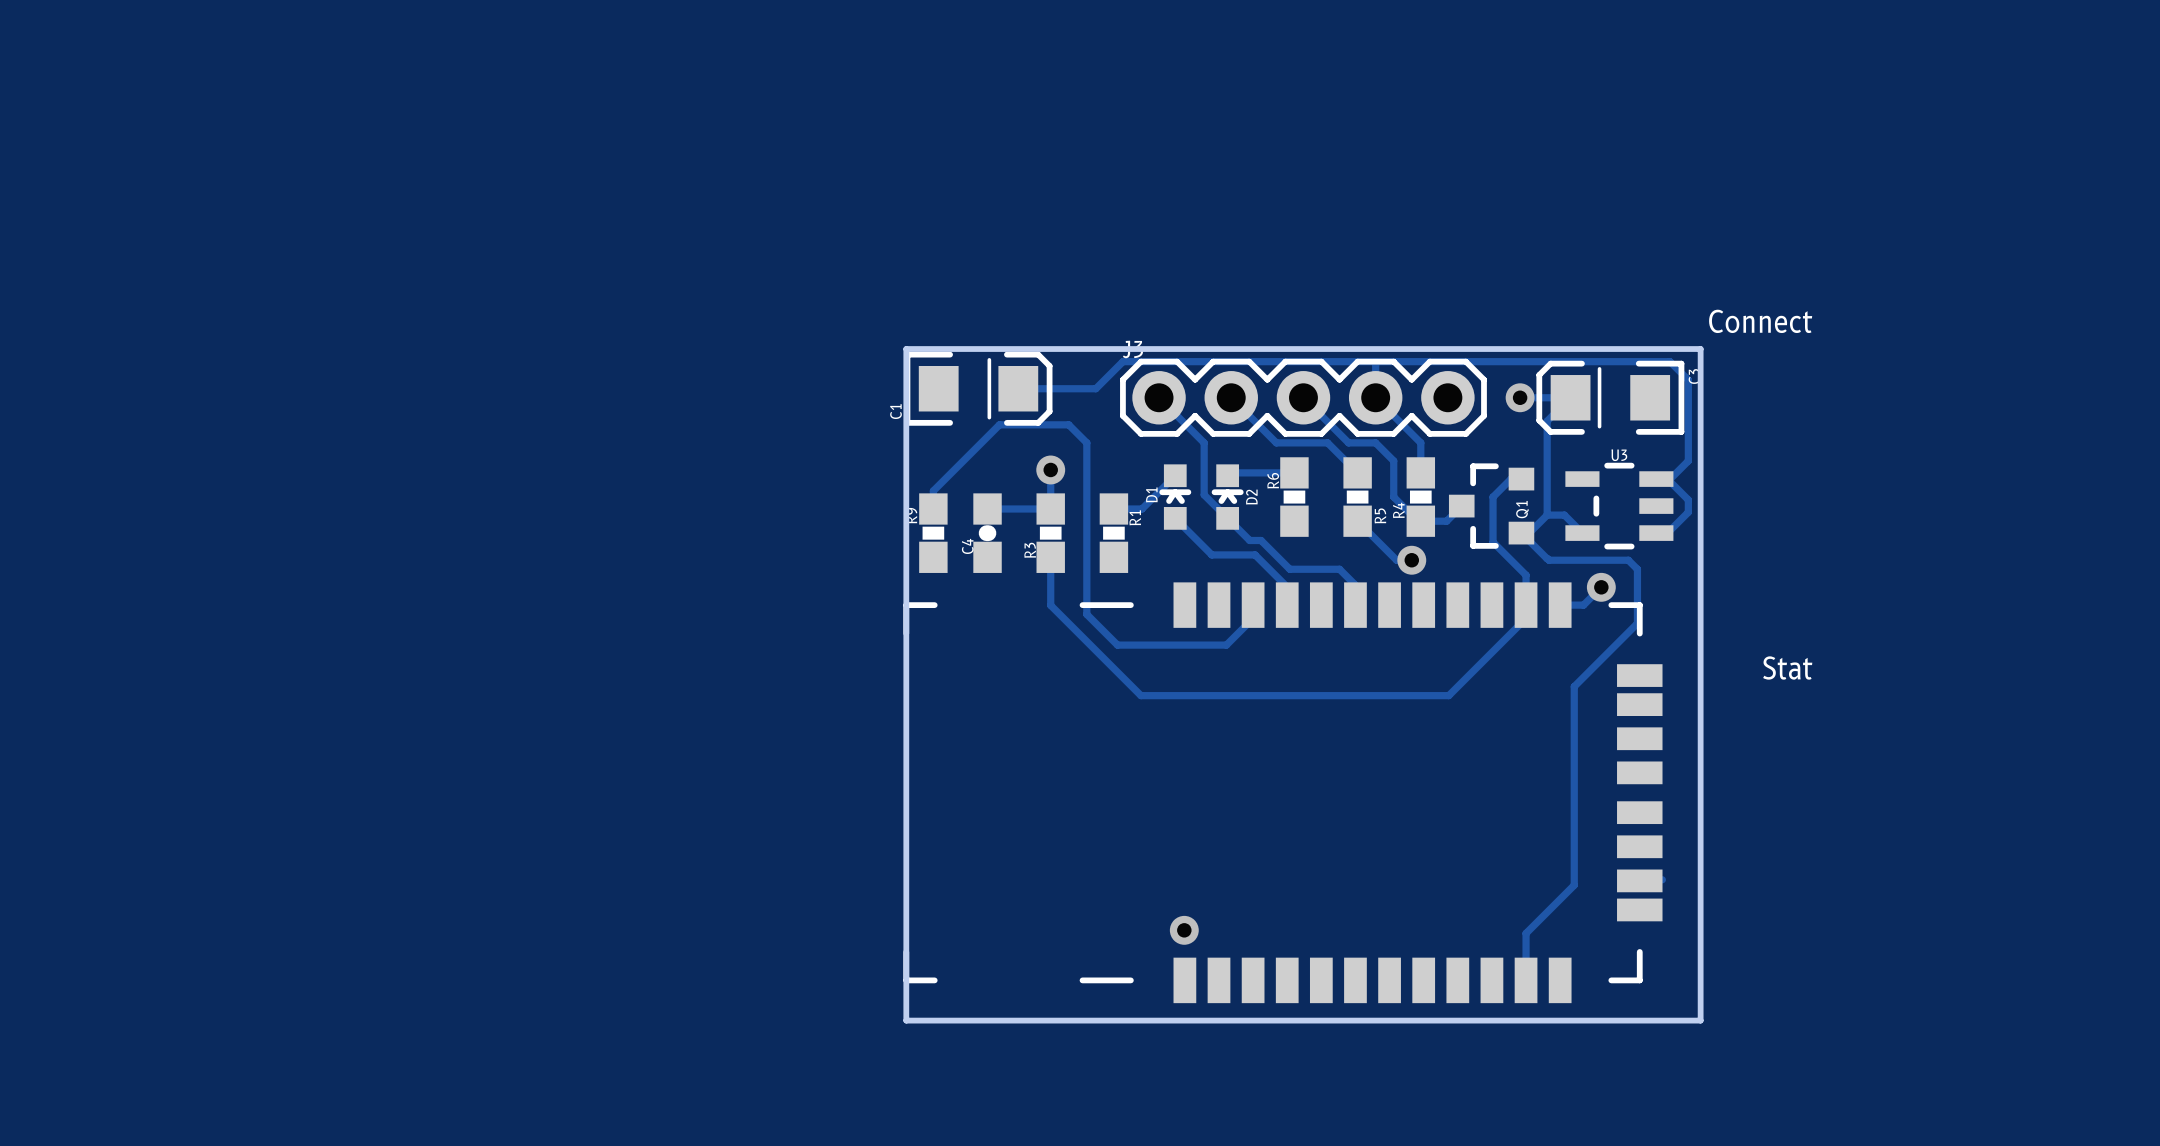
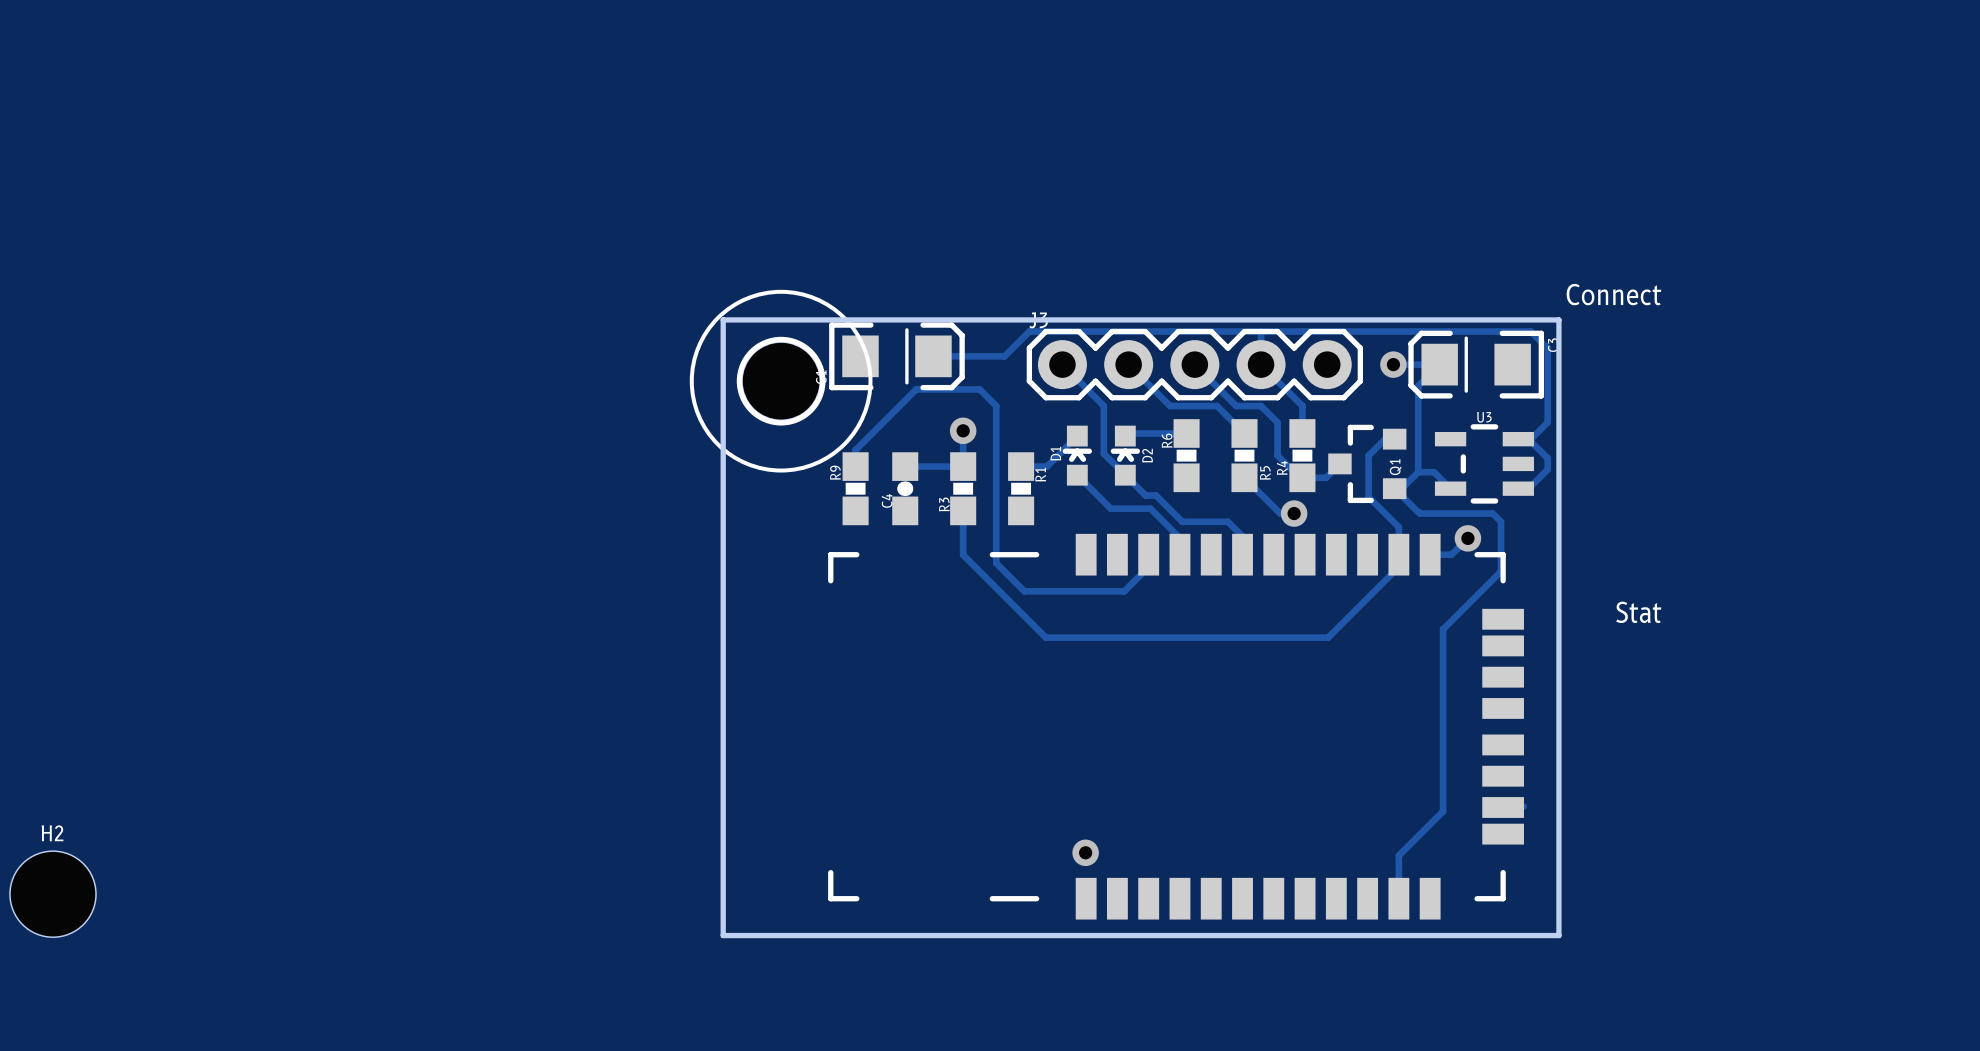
board edge: (906, 349) (906, 1020) -> (830, 319) (723, 319) (723, 935) (830, 935)
part: none -> (781, 381)
H2: none -> (52, 894)

